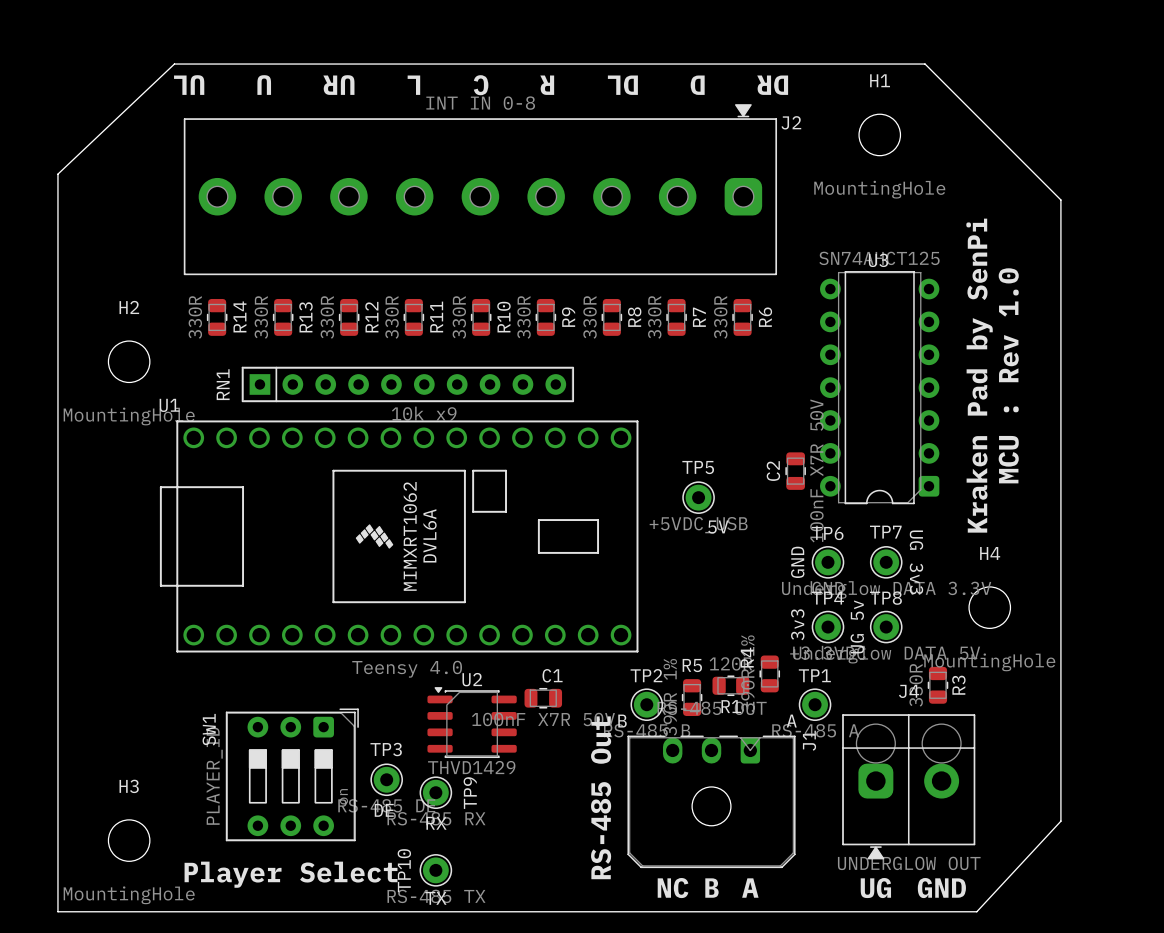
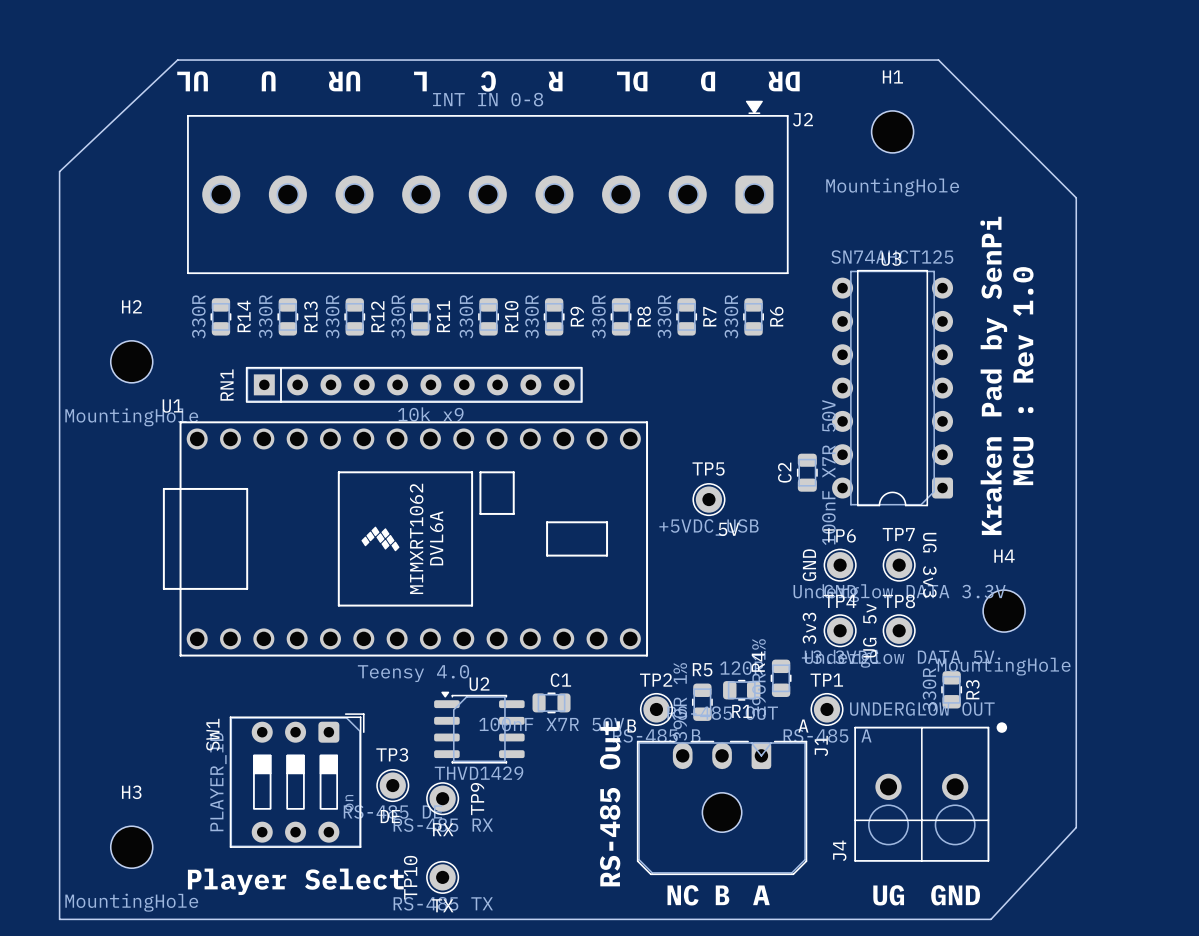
J4 name position: J4 (909, 691) -> J4 (839, 850)
J4 footprint: [842, 714, 976, 860] -> [854, 722, 1008, 862]
J4 value position: UNDERGLOW OUT (909, 863) -> UNDERGLOW OUT (922, 708)

